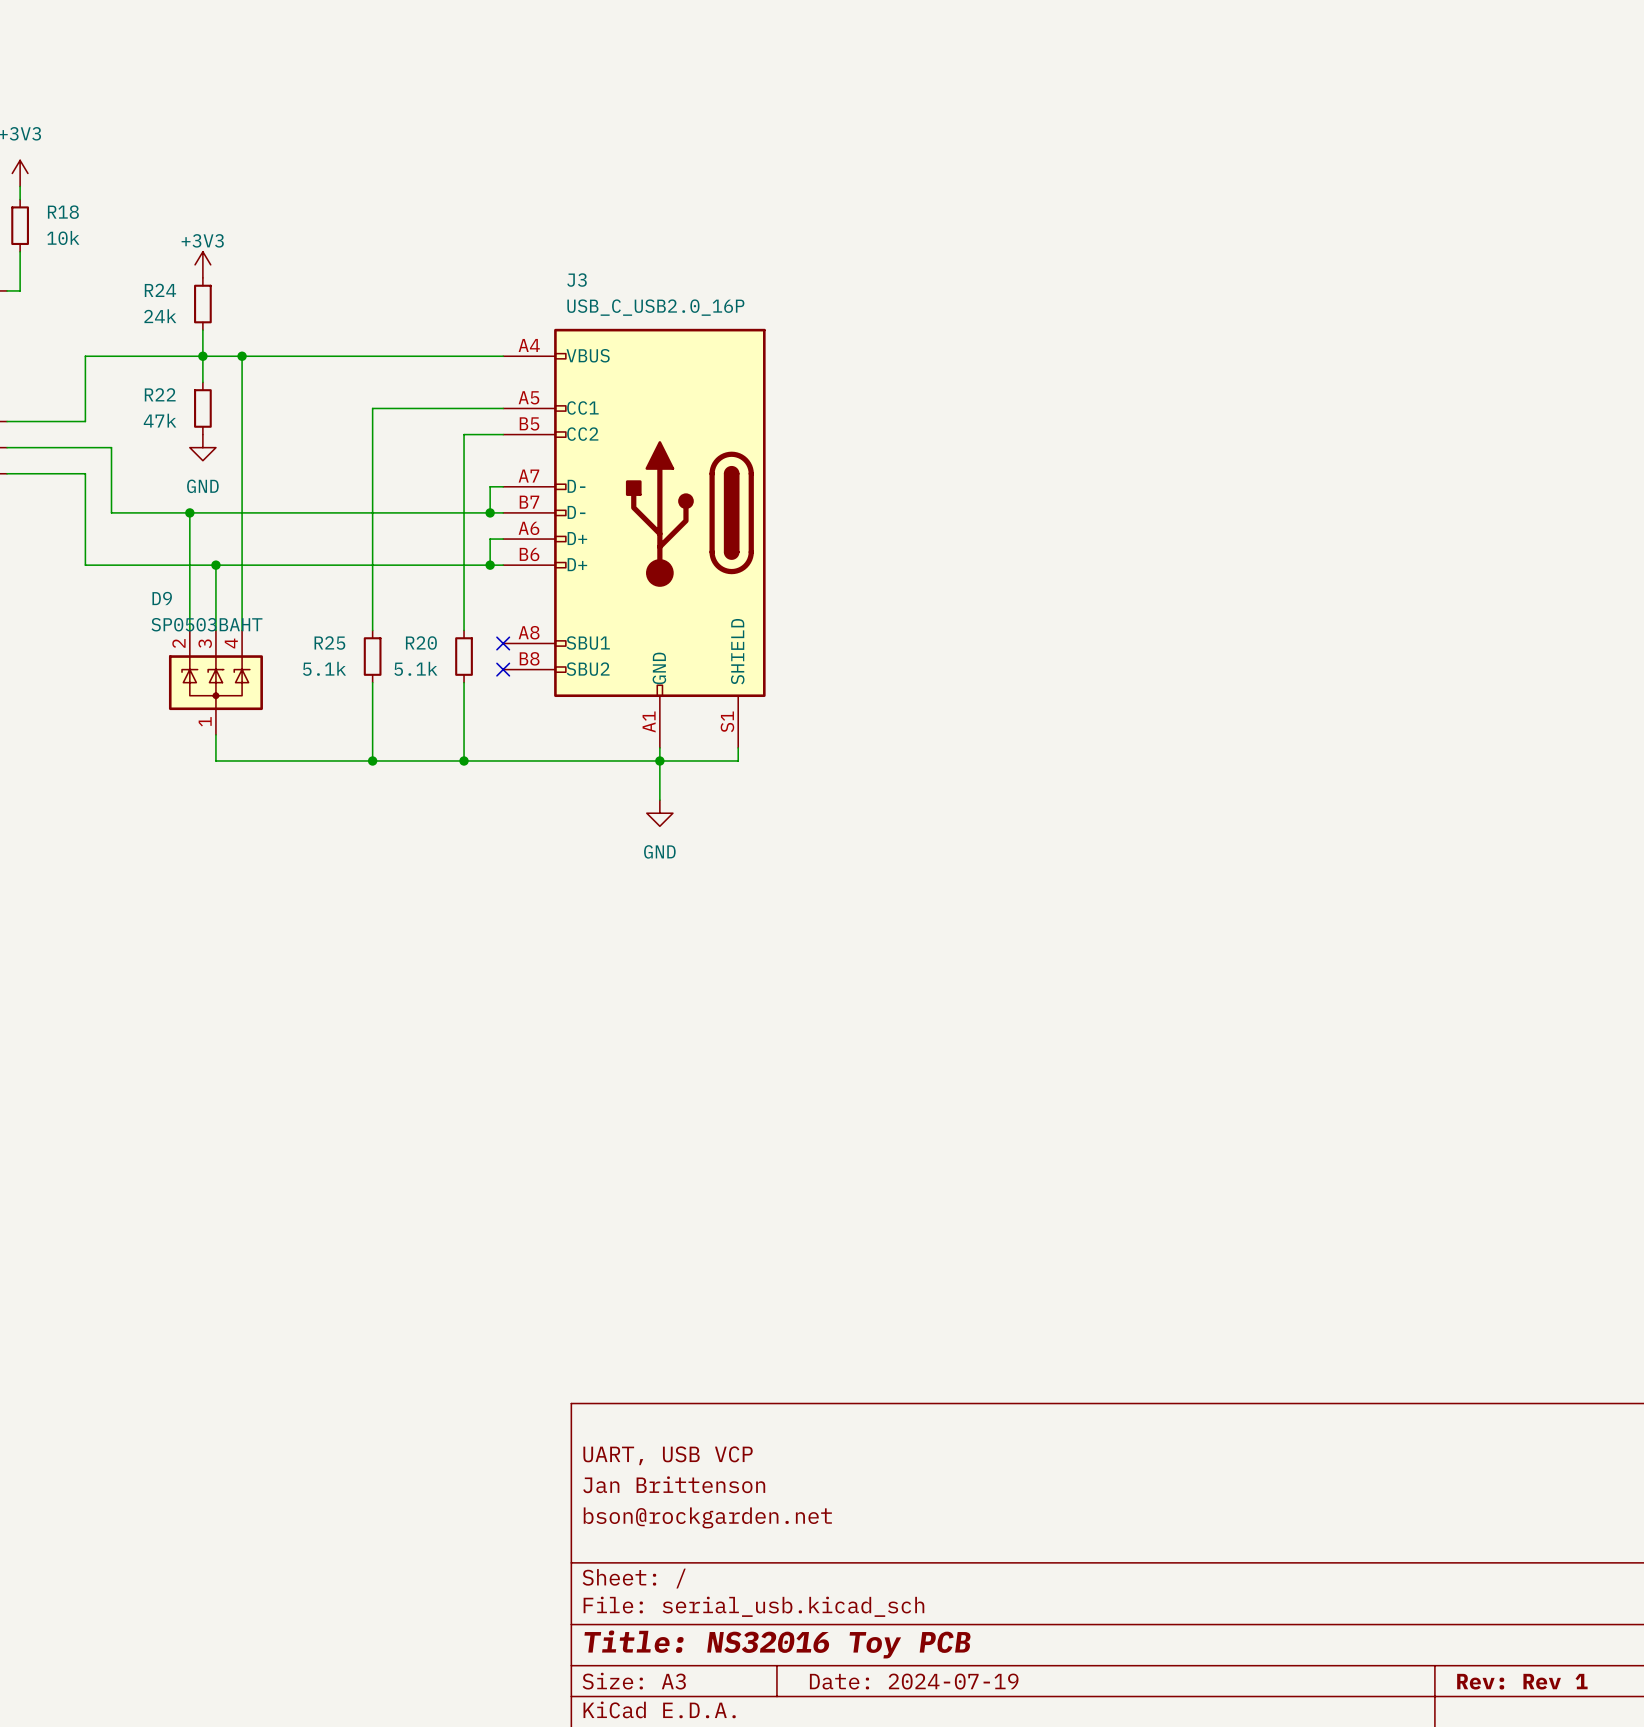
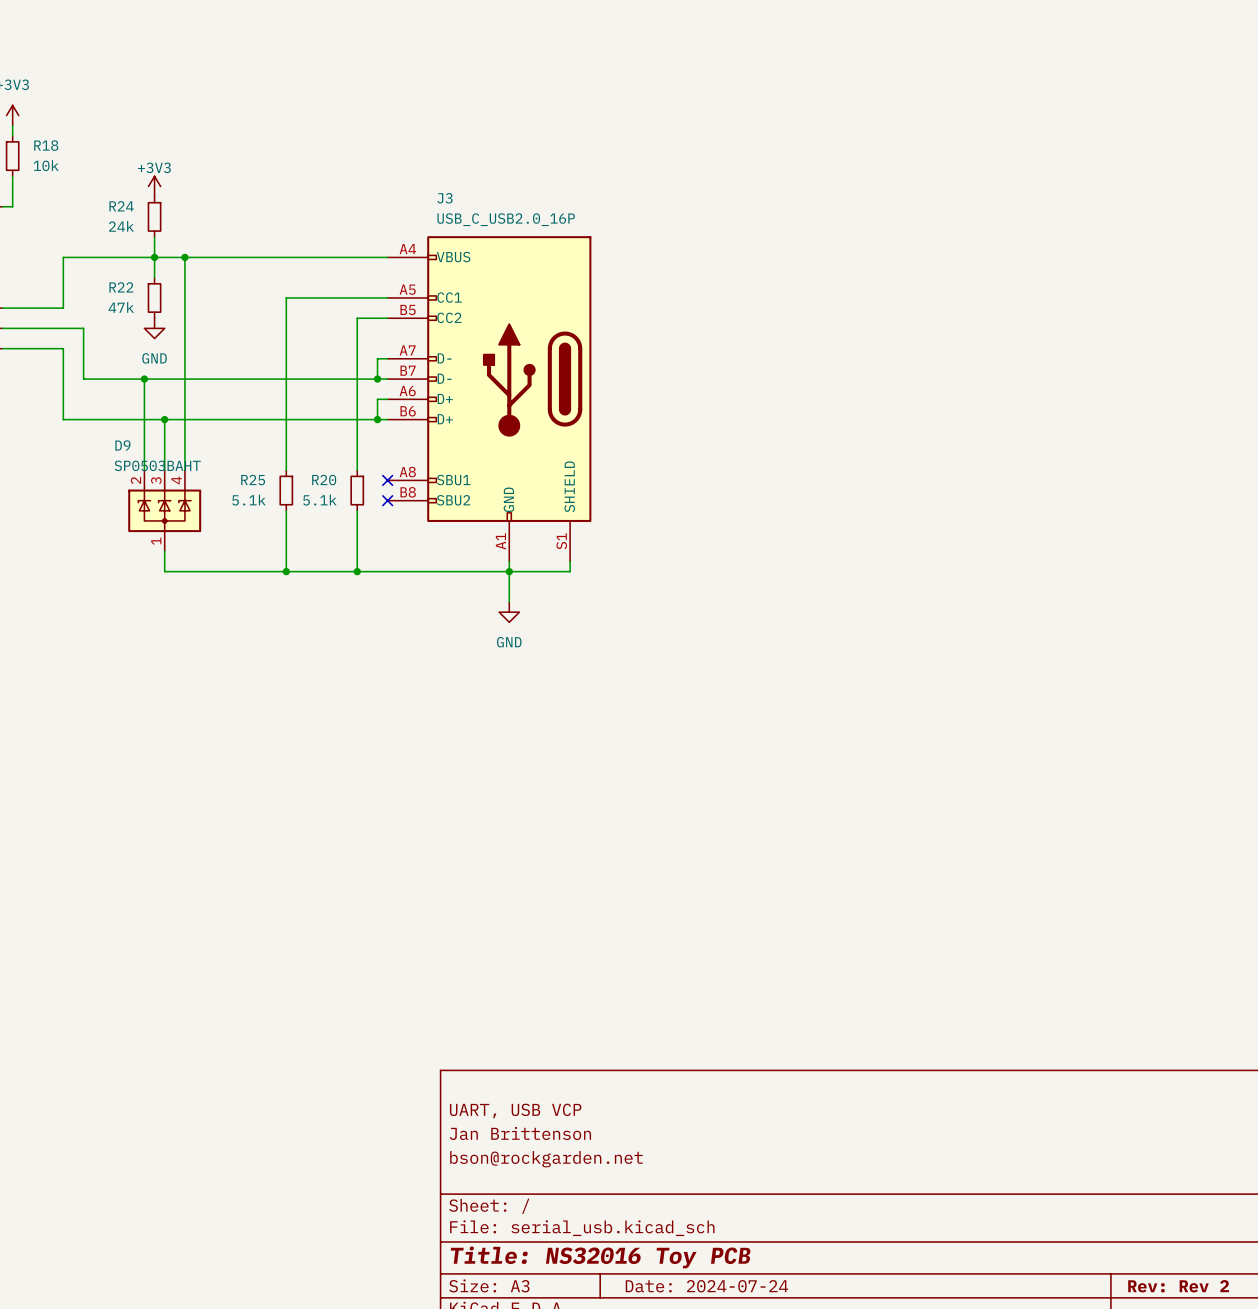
title block: Date: 2024-07-19 (914, 1681) -> Date: 2024-07-24 (706, 1286)
title block: Rev: Rev 1 (1522, 1681) -> Rev: Rev 2 (1178, 1286)

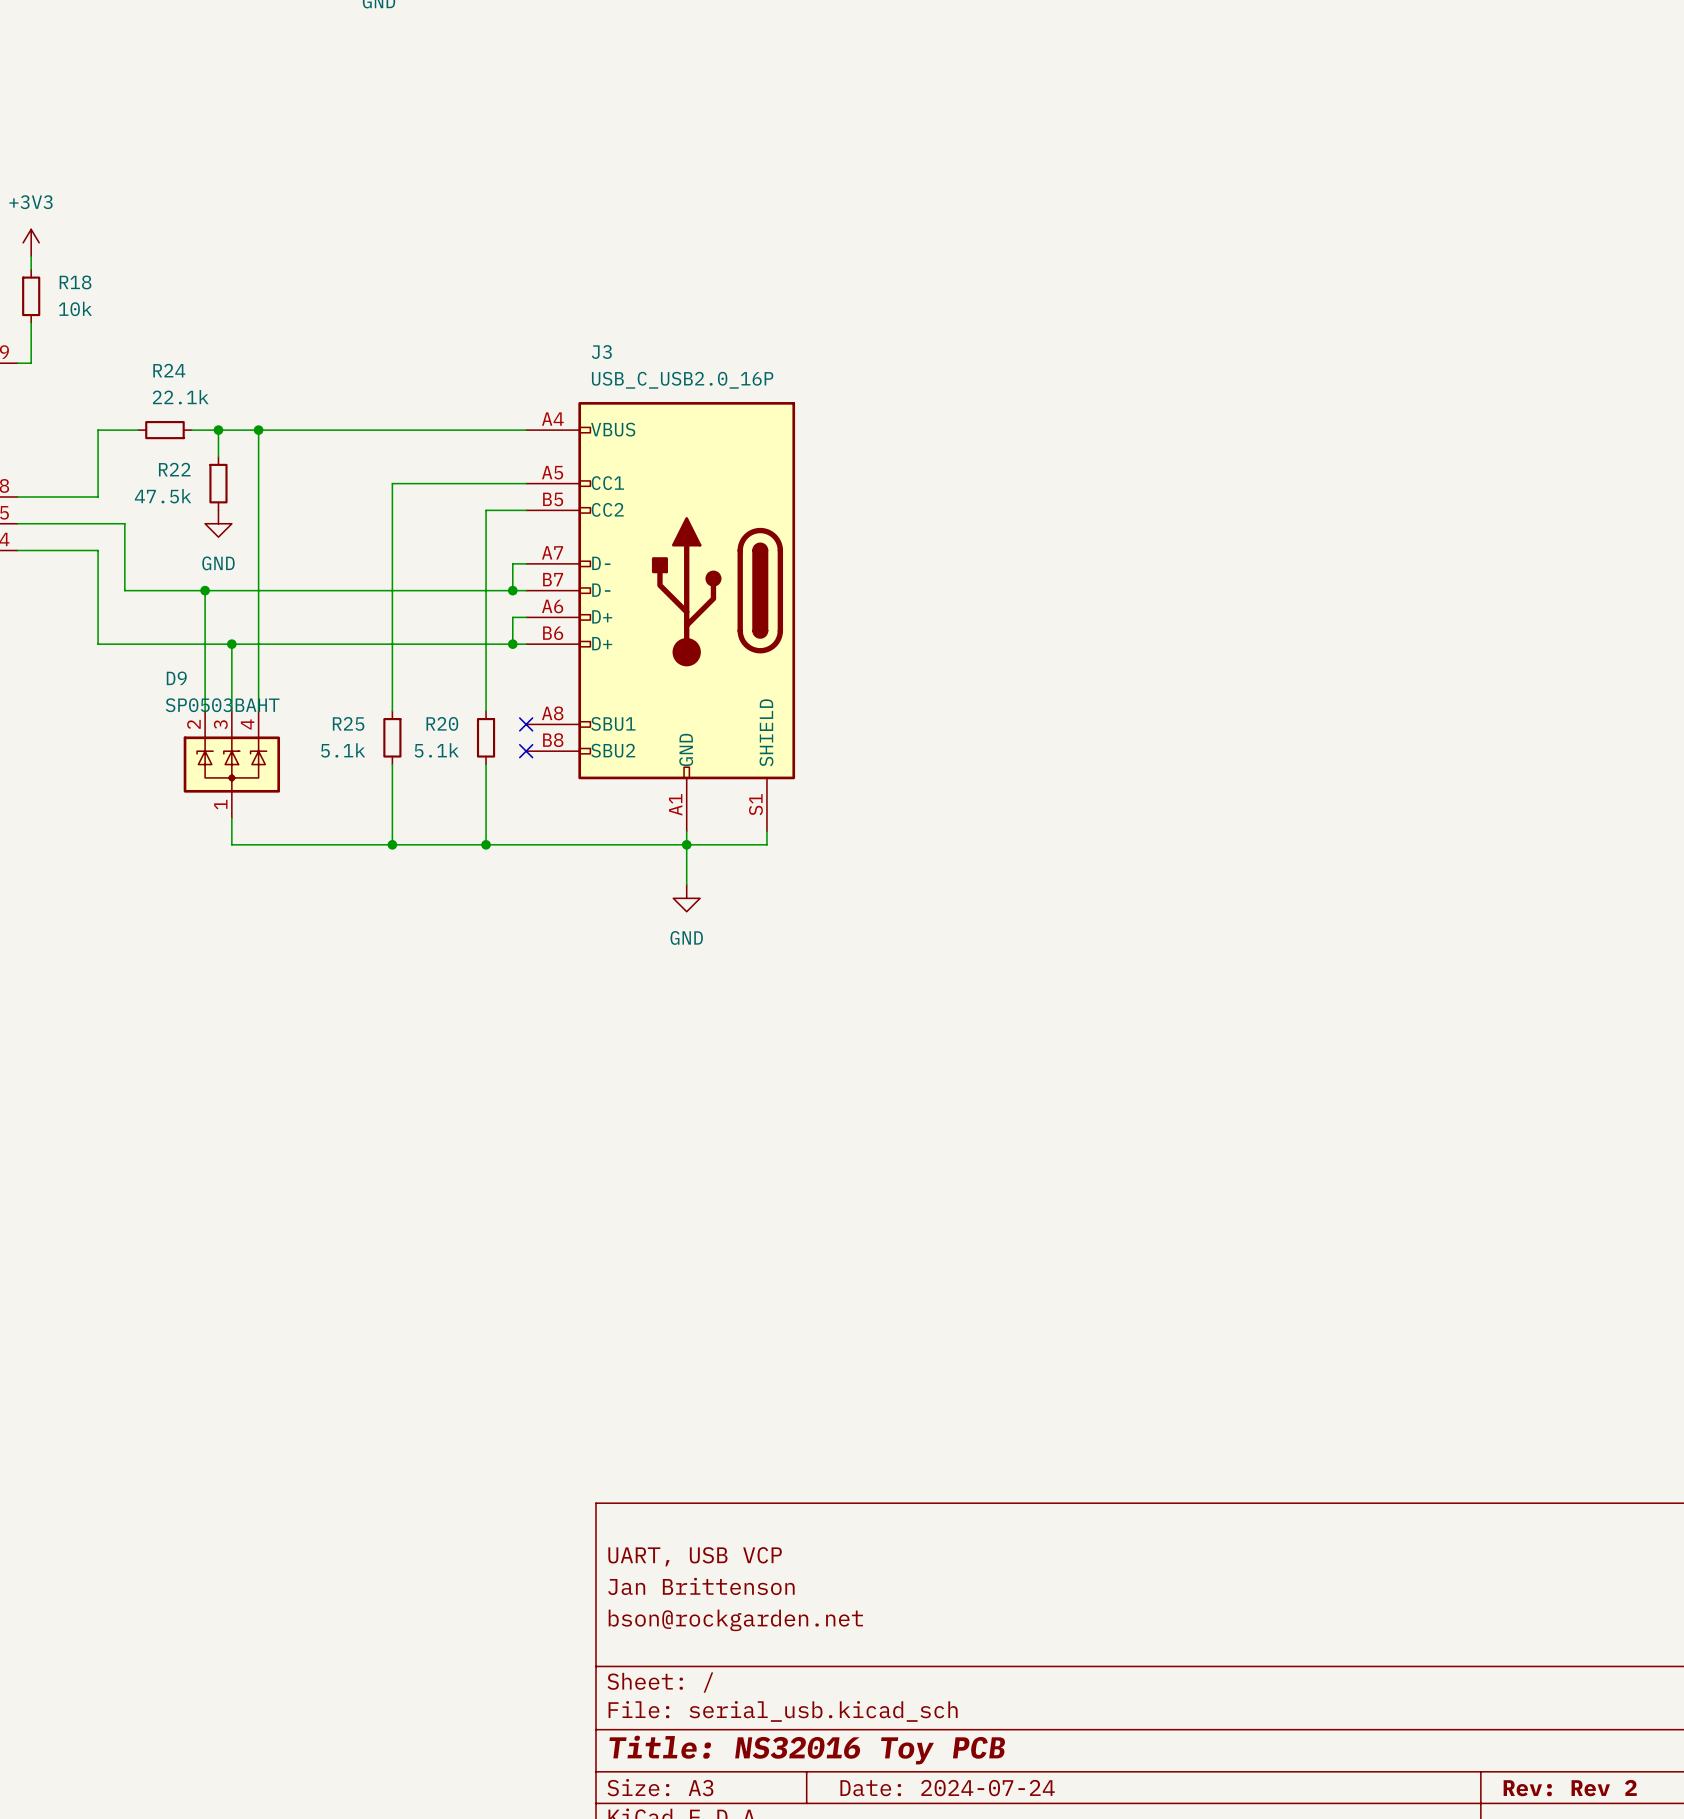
power symbol: +3V3 (154, 186) -> none
R24 rotation: 0° (154, 216) -> 90° clockwise (164, 430)
R24 position: (154, 216) -> (164, 430)
R24 value: 24k (121, 226) -> 22.1k (180, 397)
wire: (154, 237) (154, 257) -> none
wire: (93, 257) (134, 257) -> none
R22 value: 47k (121, 307) -> 47.5k (163, 496)

